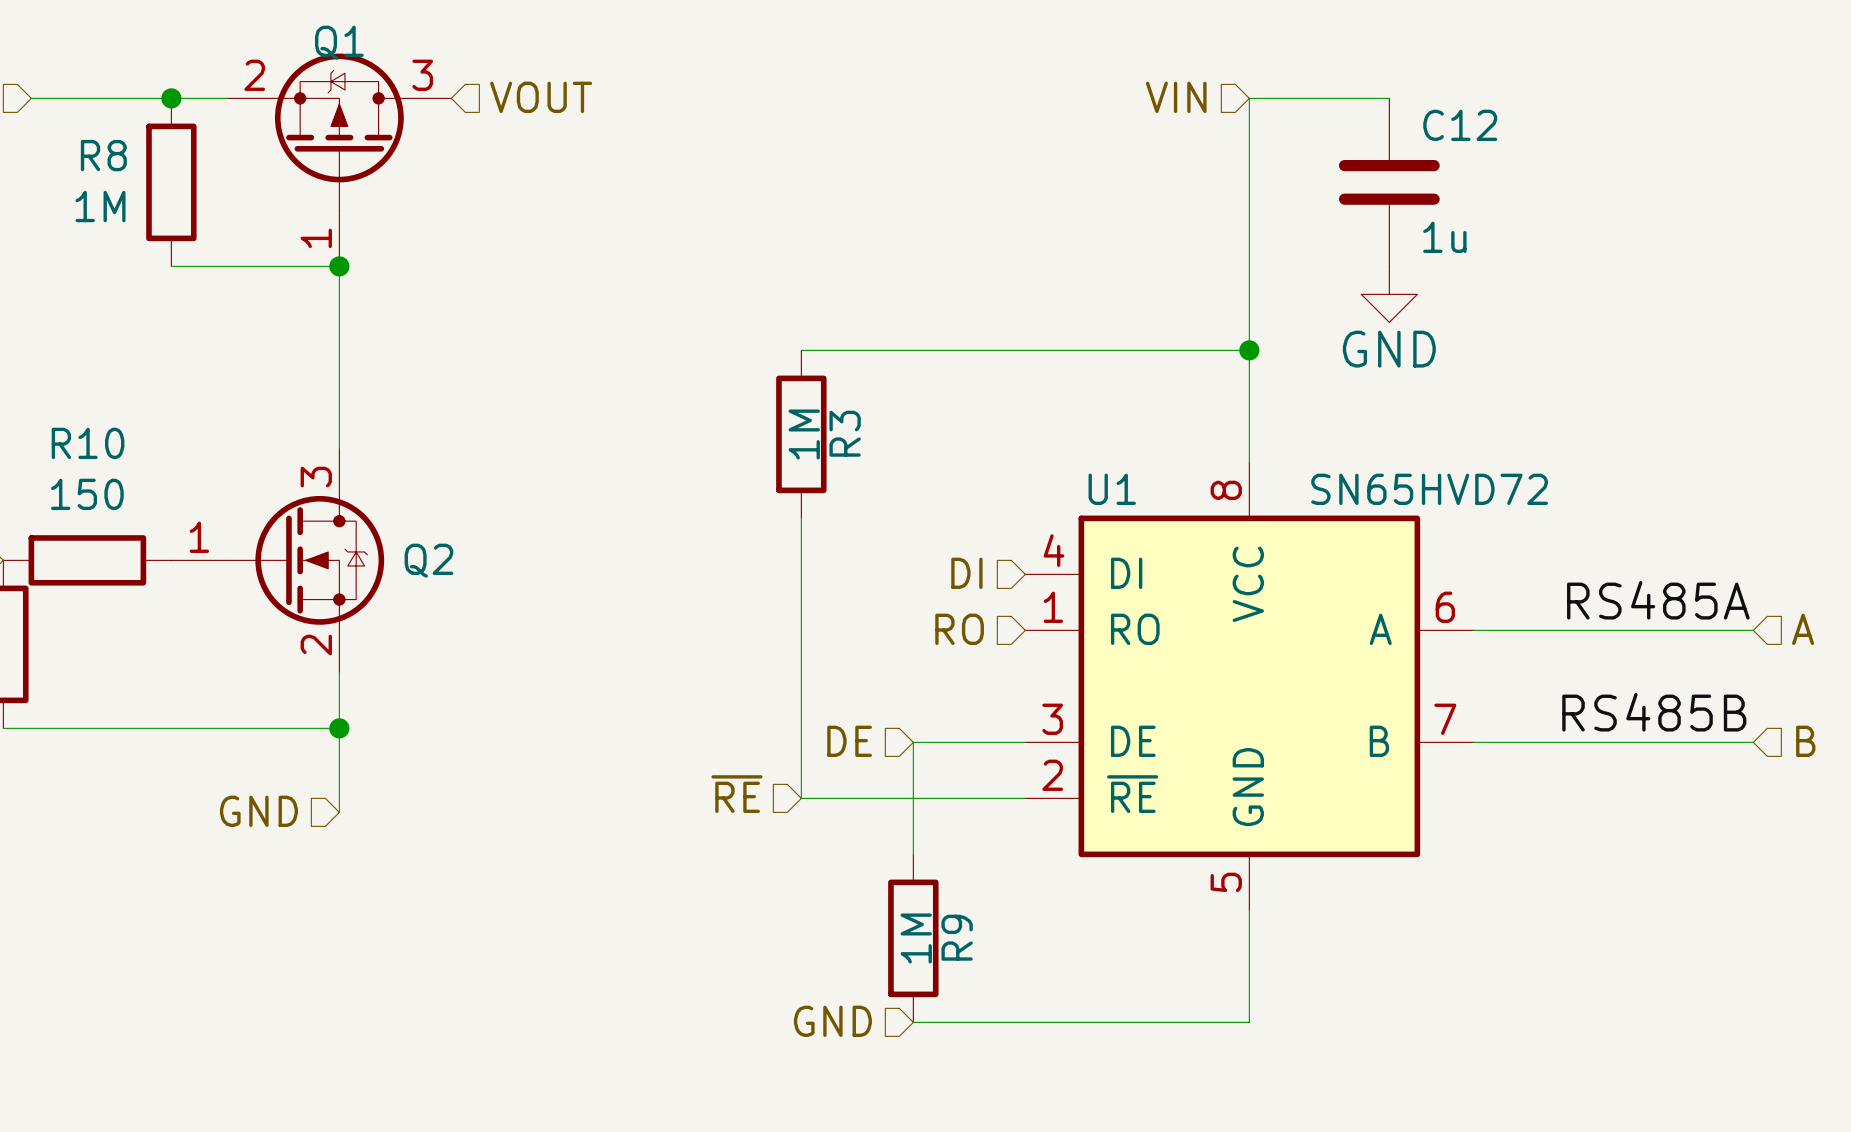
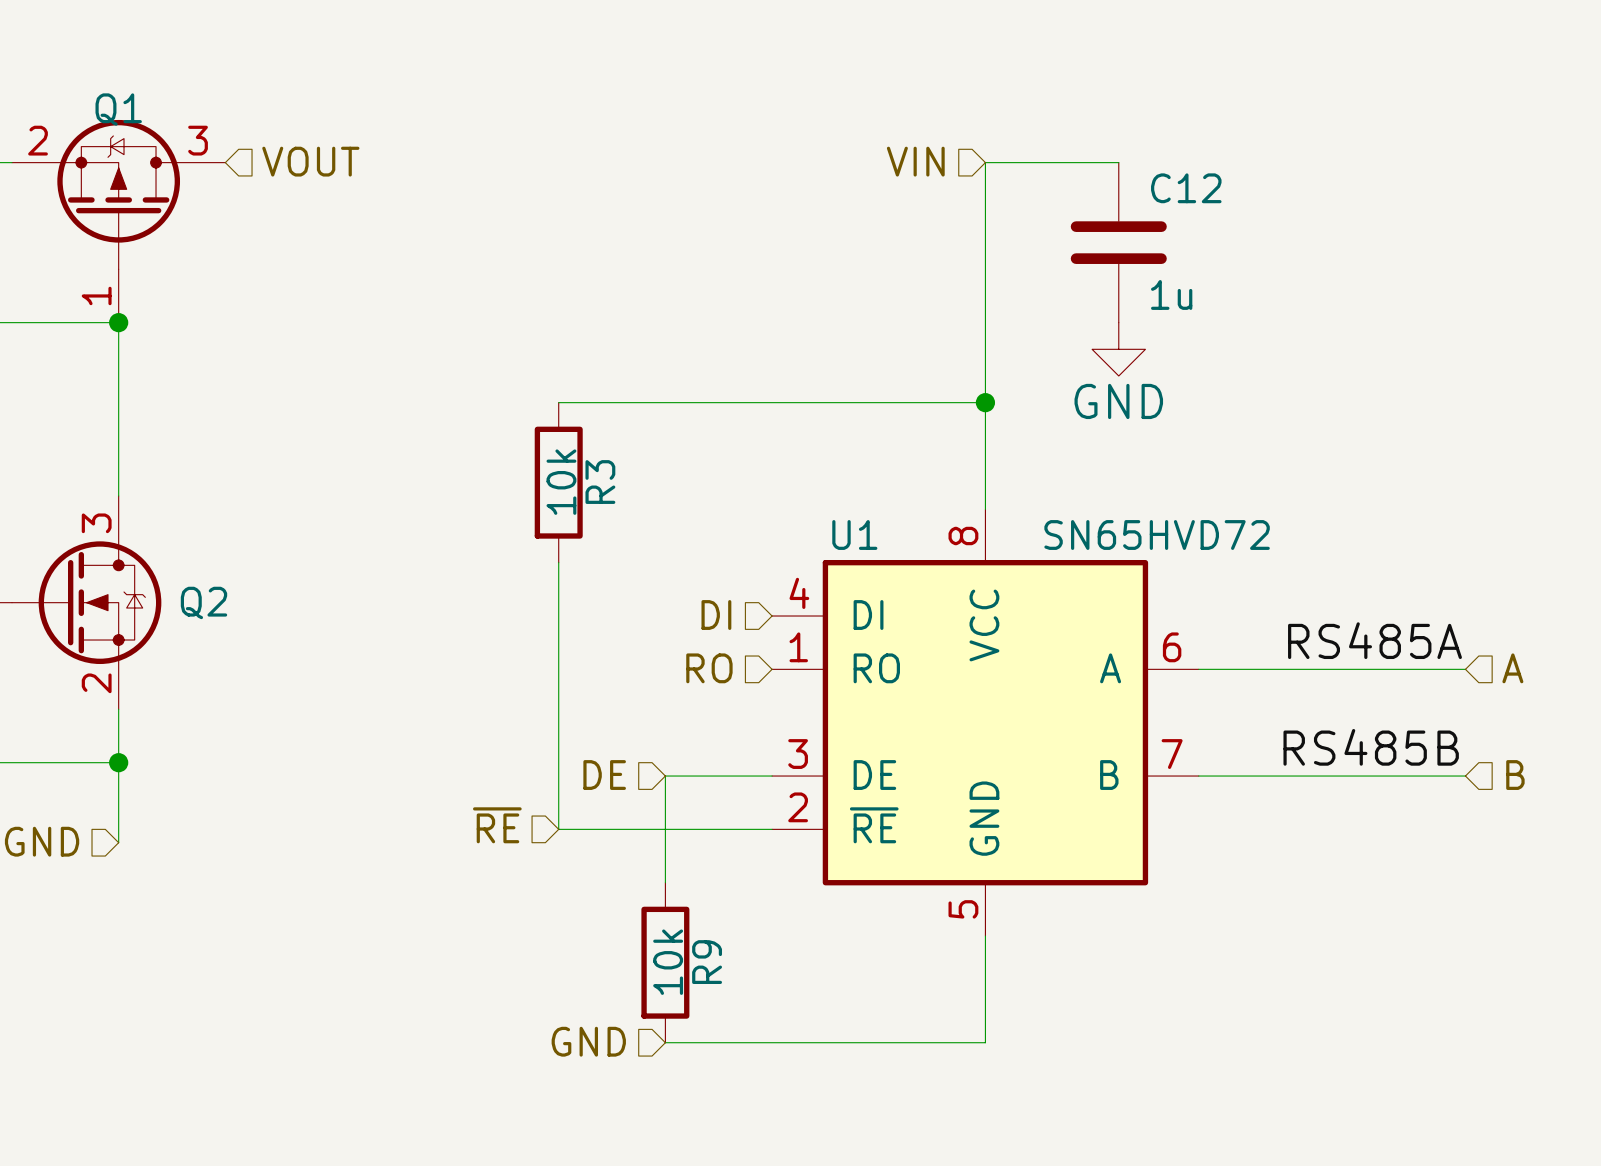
R3 value: 1M (804, 434) -> 10k (561, 482)
R9 value: 1M (916, 938) -> 10k (668, 962)

